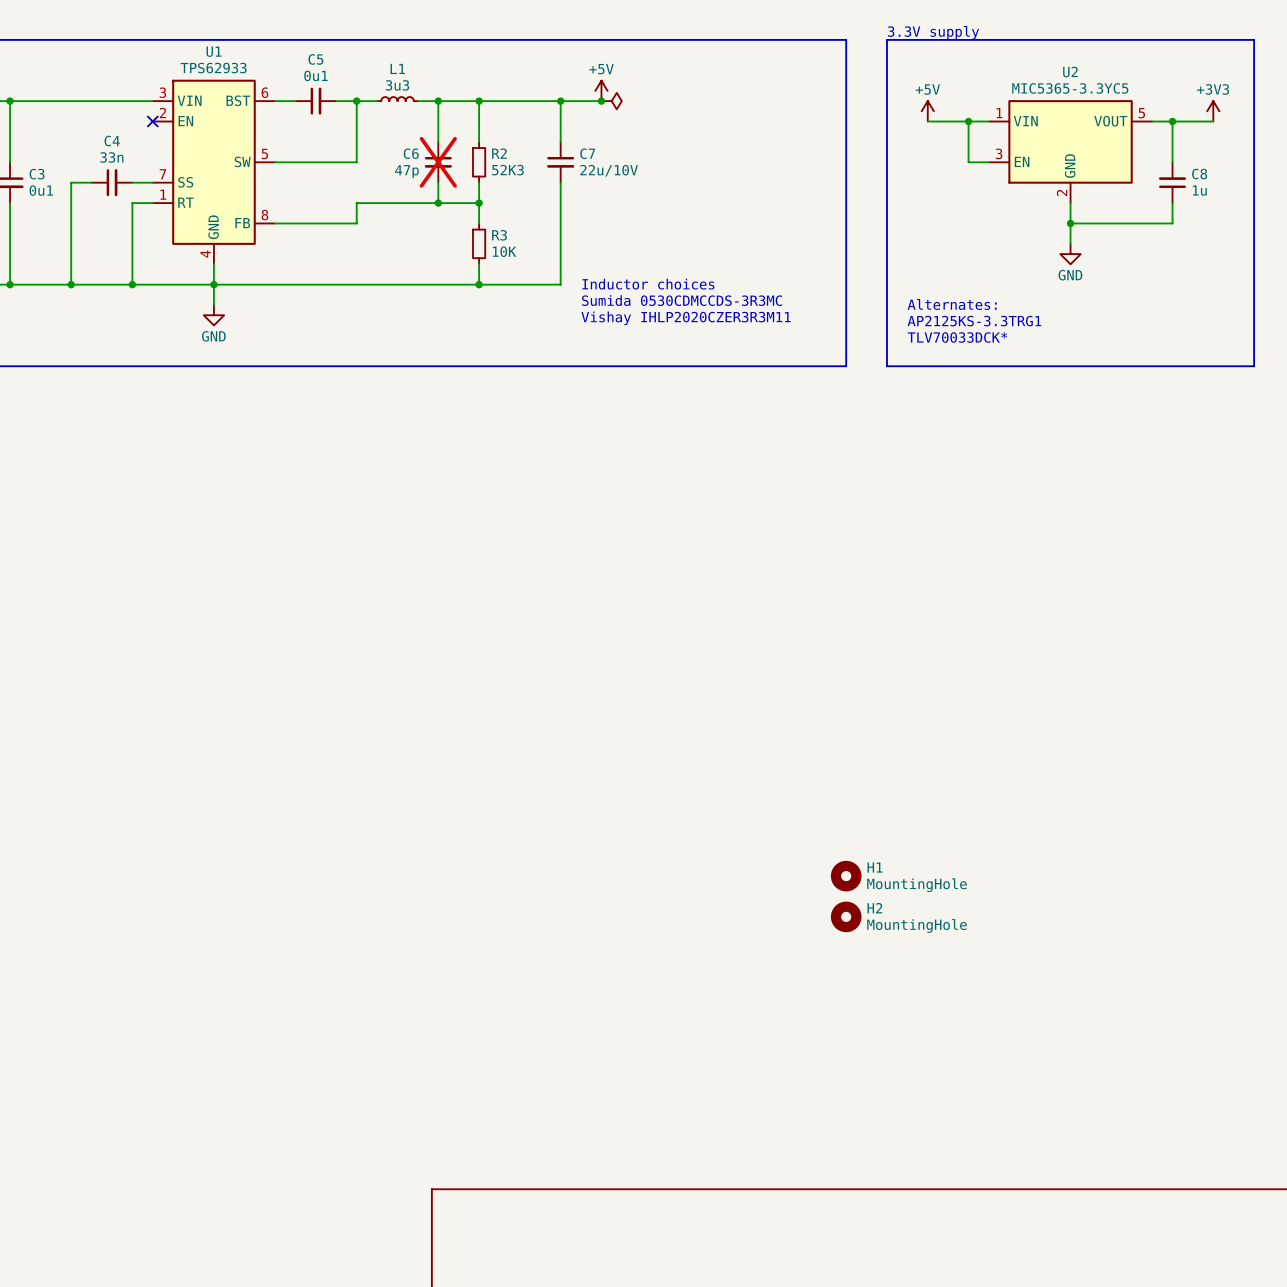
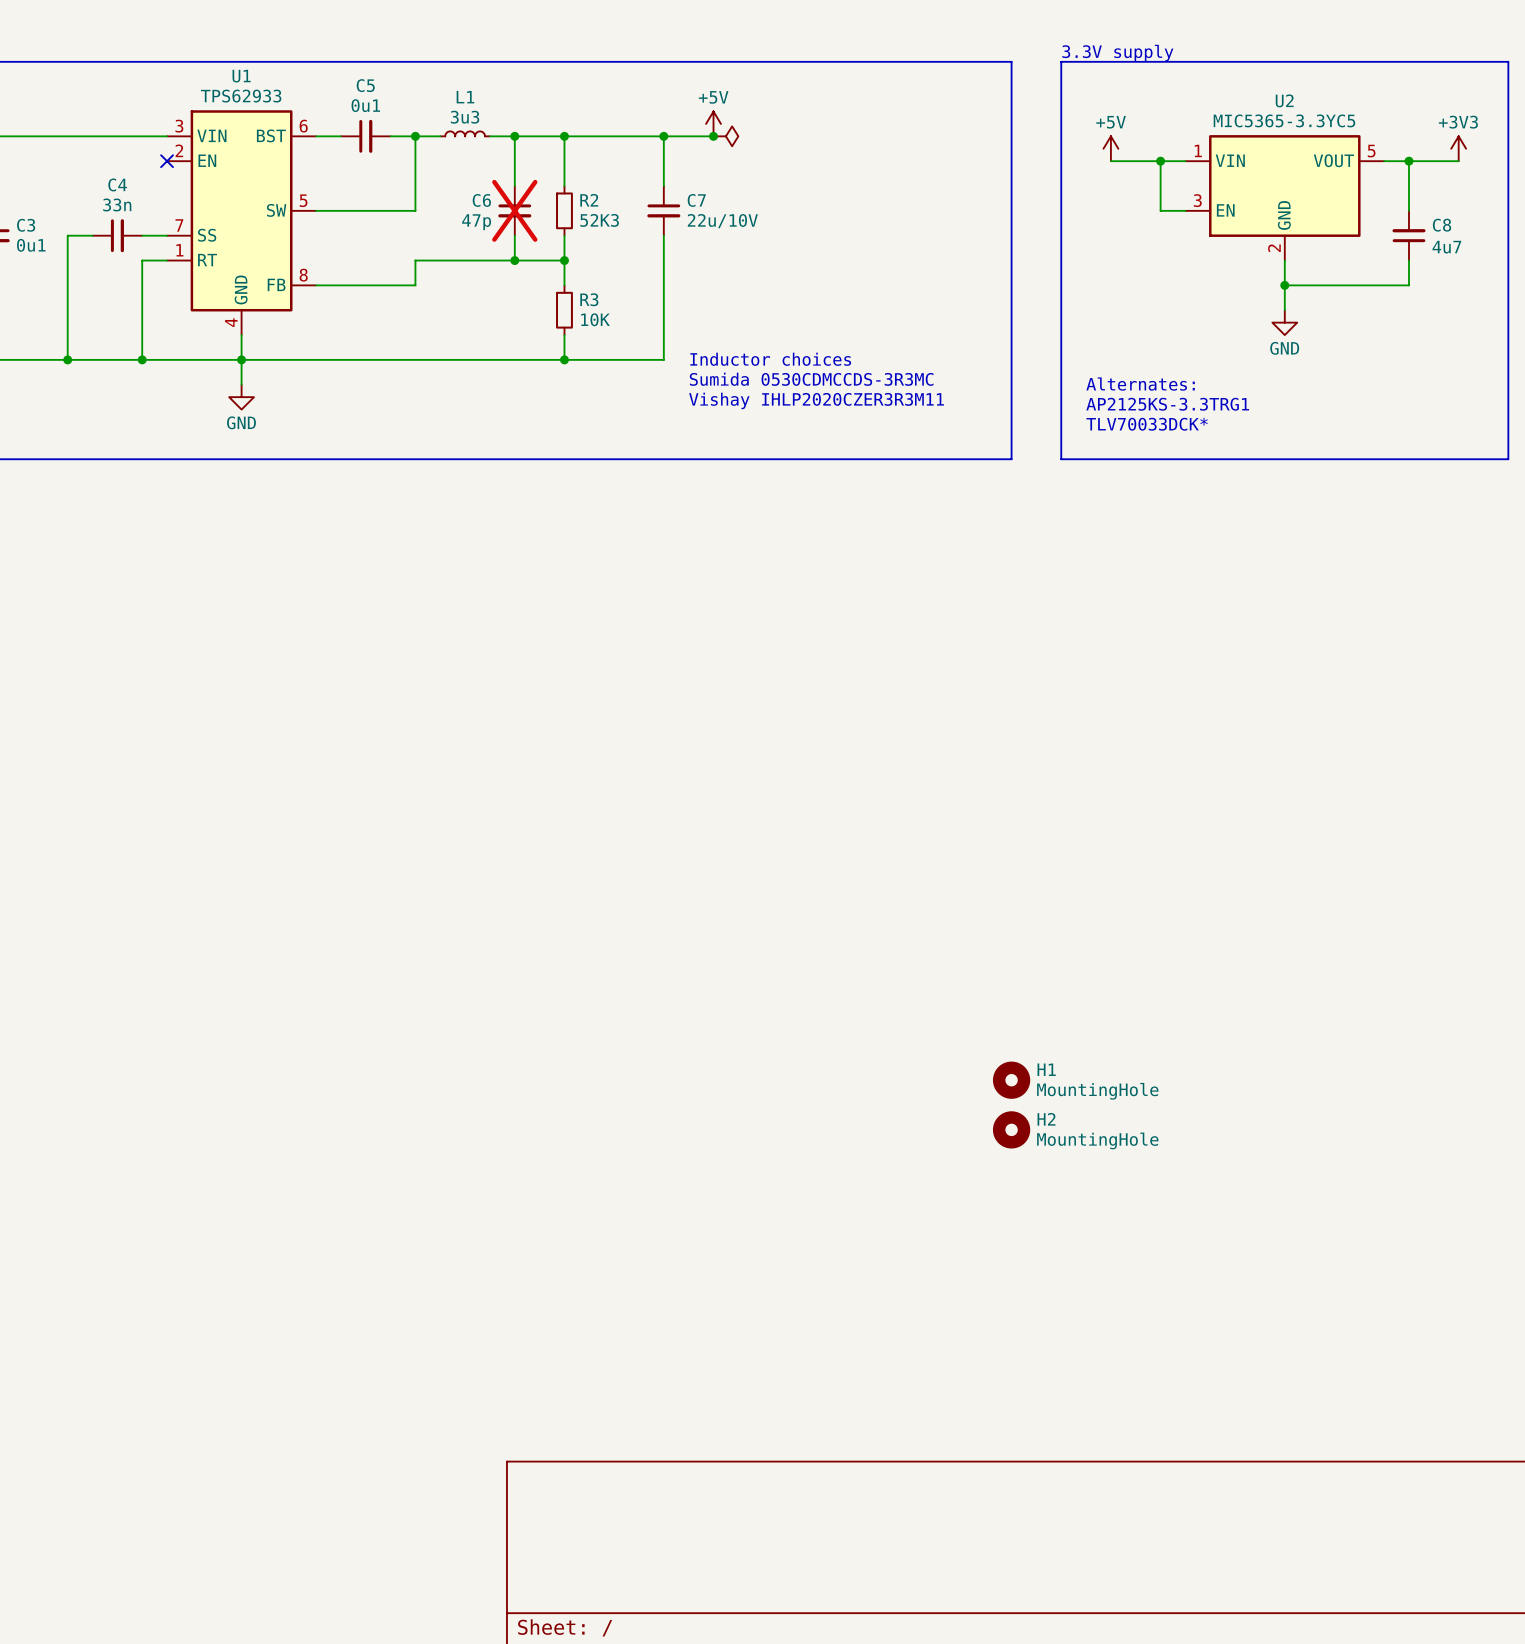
C8 value: 1u (1199, 190) -> 4u7 (1446, 247)

